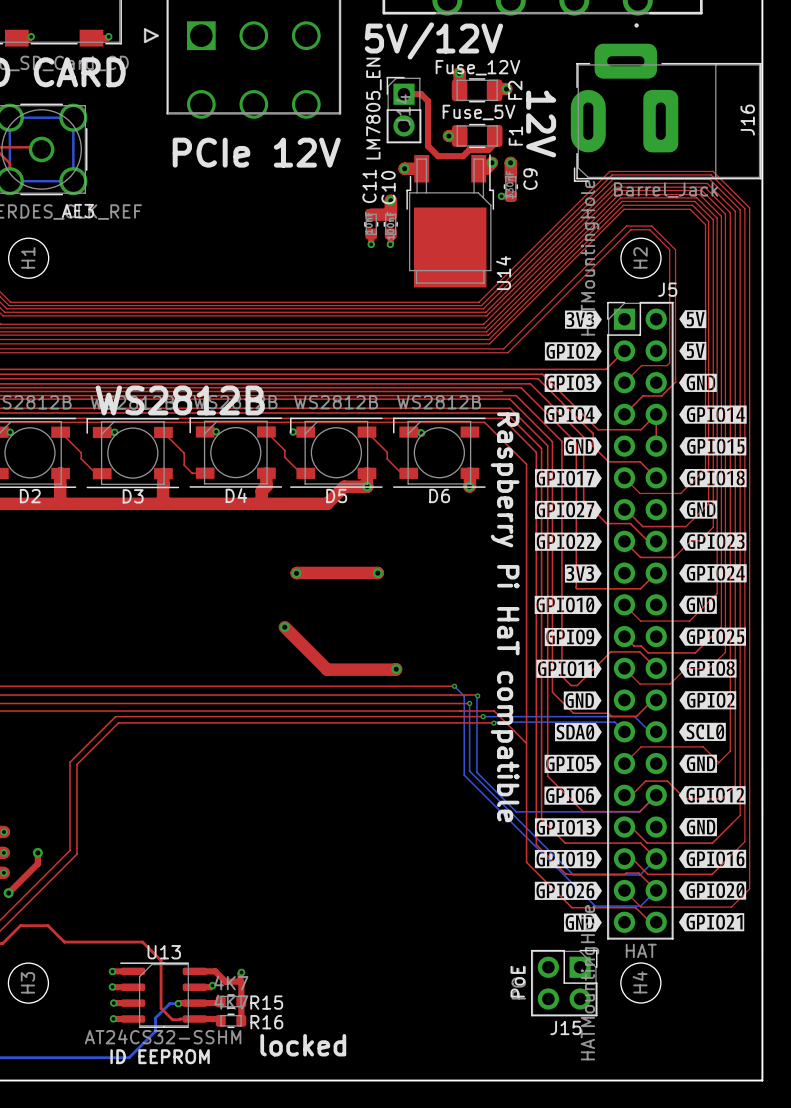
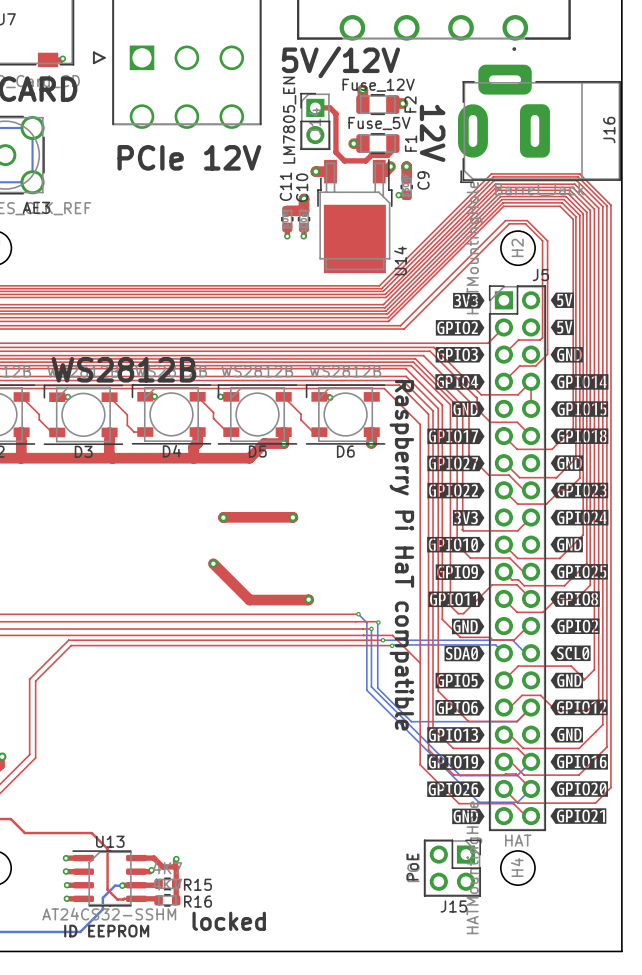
top track: none -> (399, 362) (413, 362) (457, 405) (457, 544) (470, 557) (509, 557) (523, 571) (531, 571)

